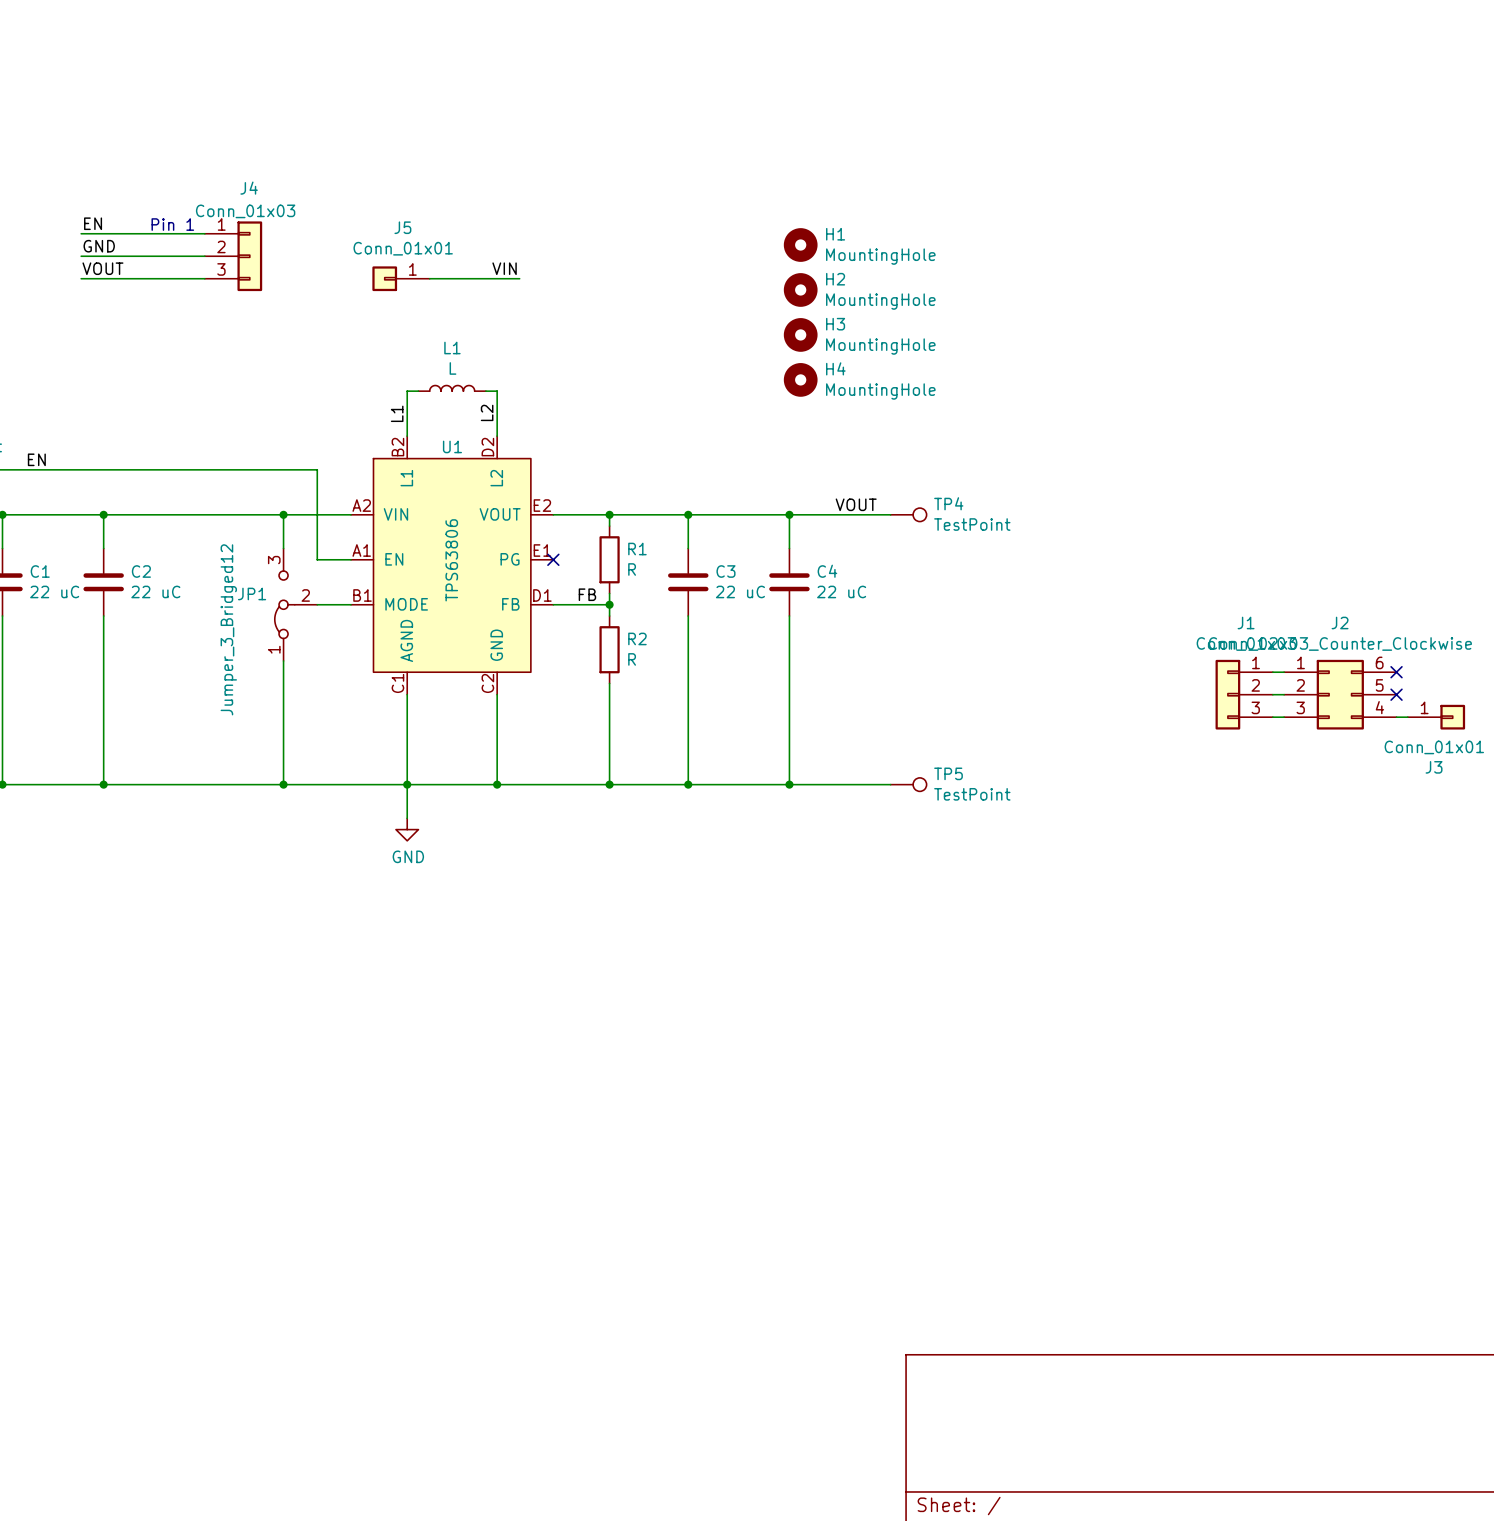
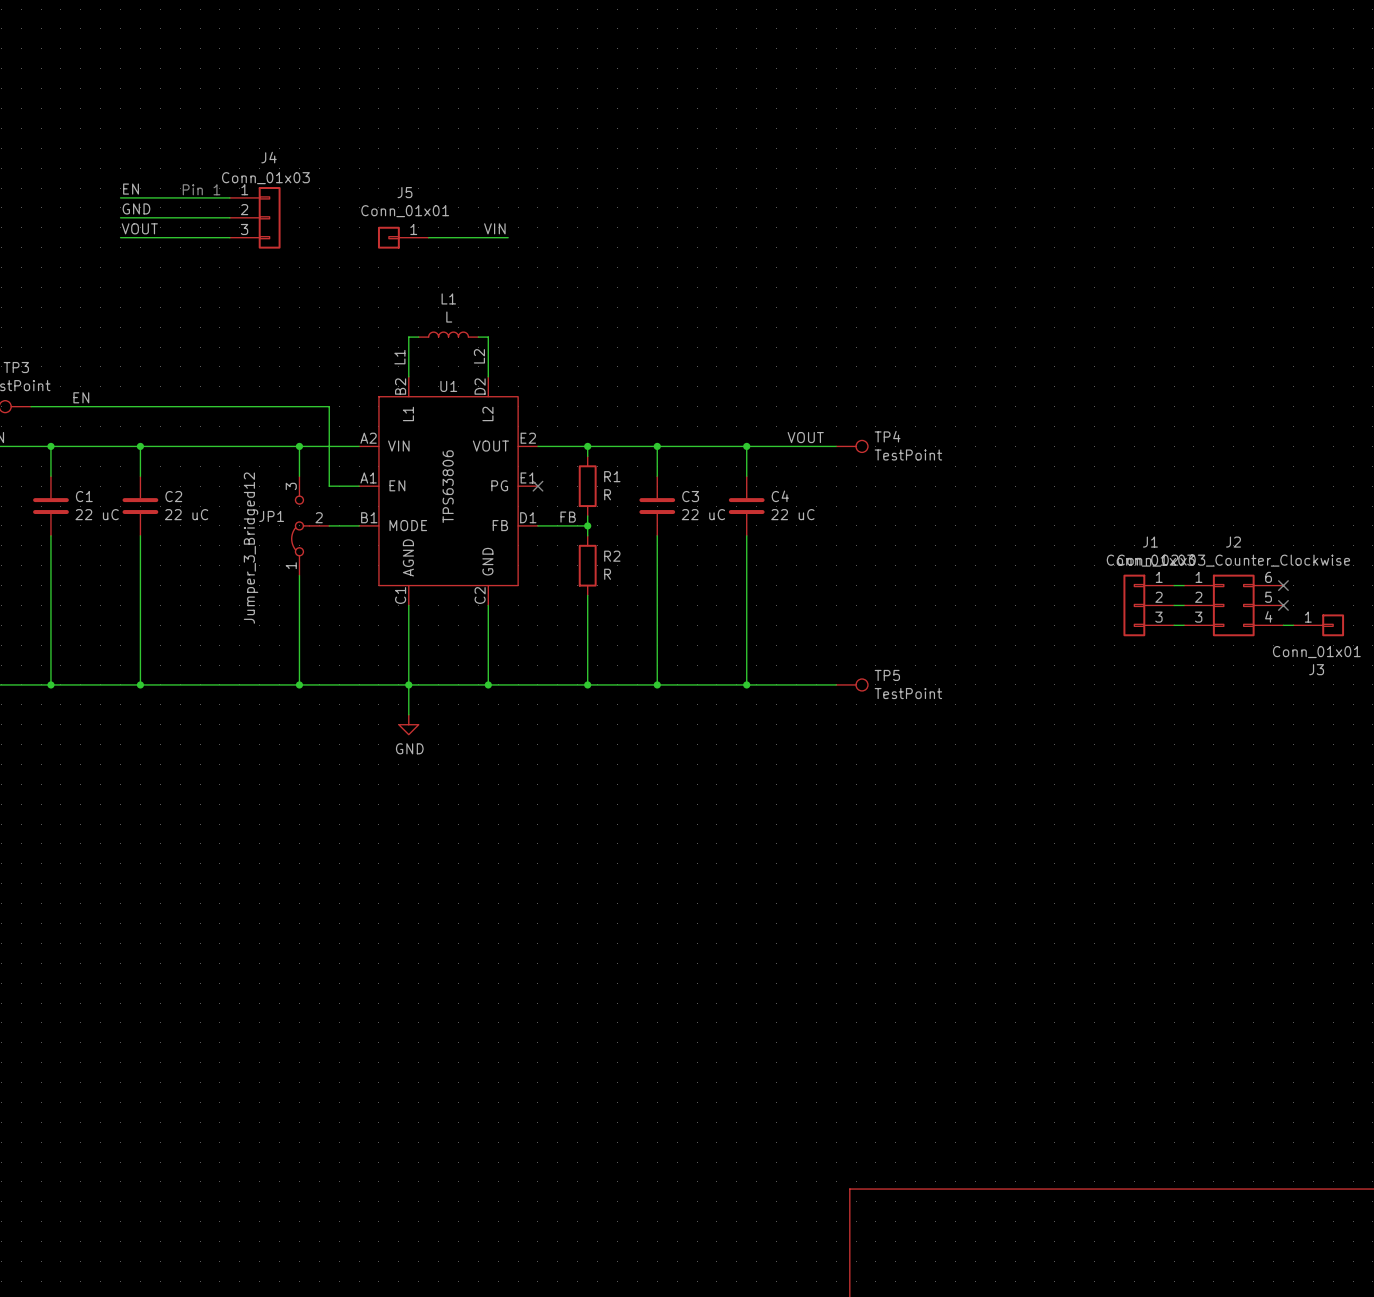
H1: MountingHole (800, 245) -> none
H2: MountingHole (800, 289) -> none
H3: MountingHole (800, 334) -> none
H4: MountingHole (800, 379) -> none

